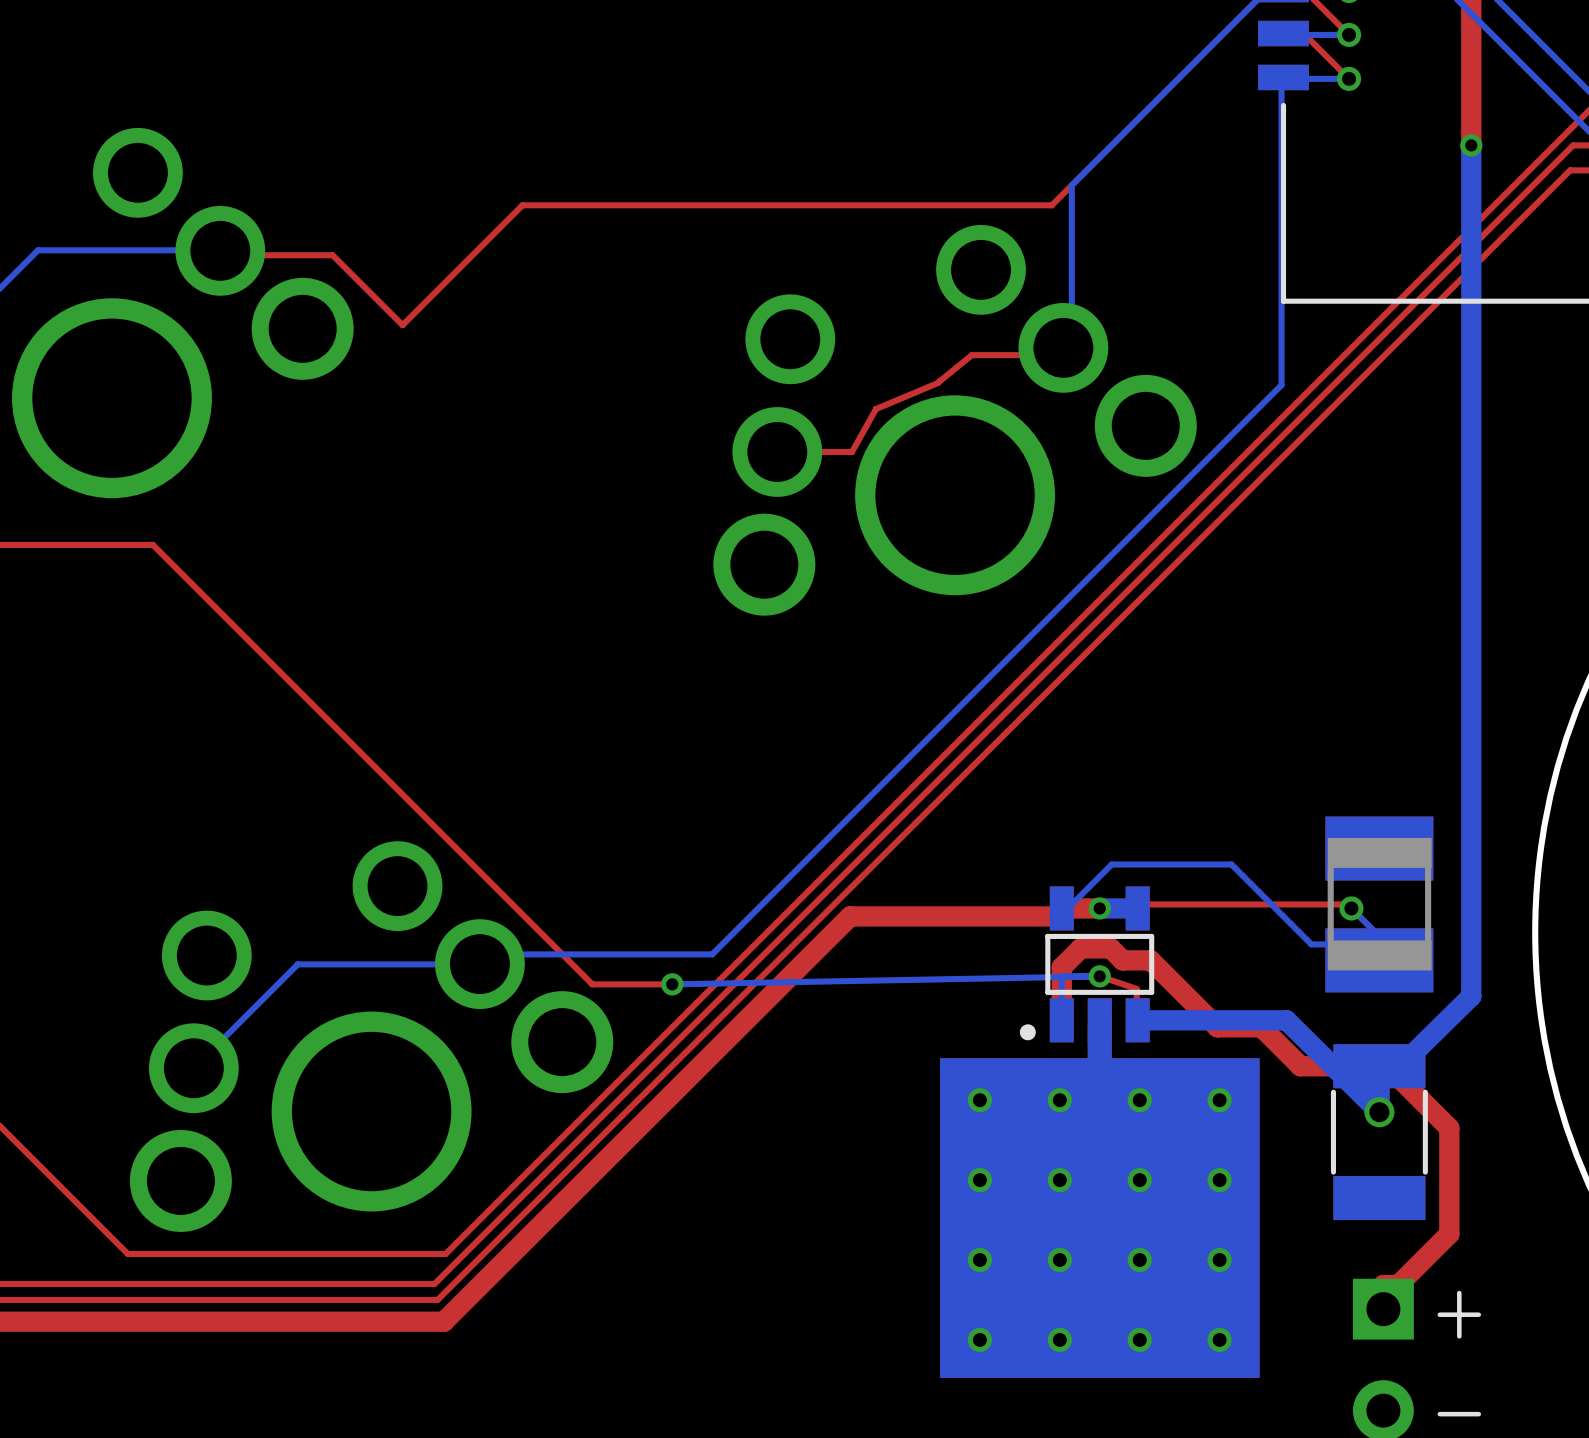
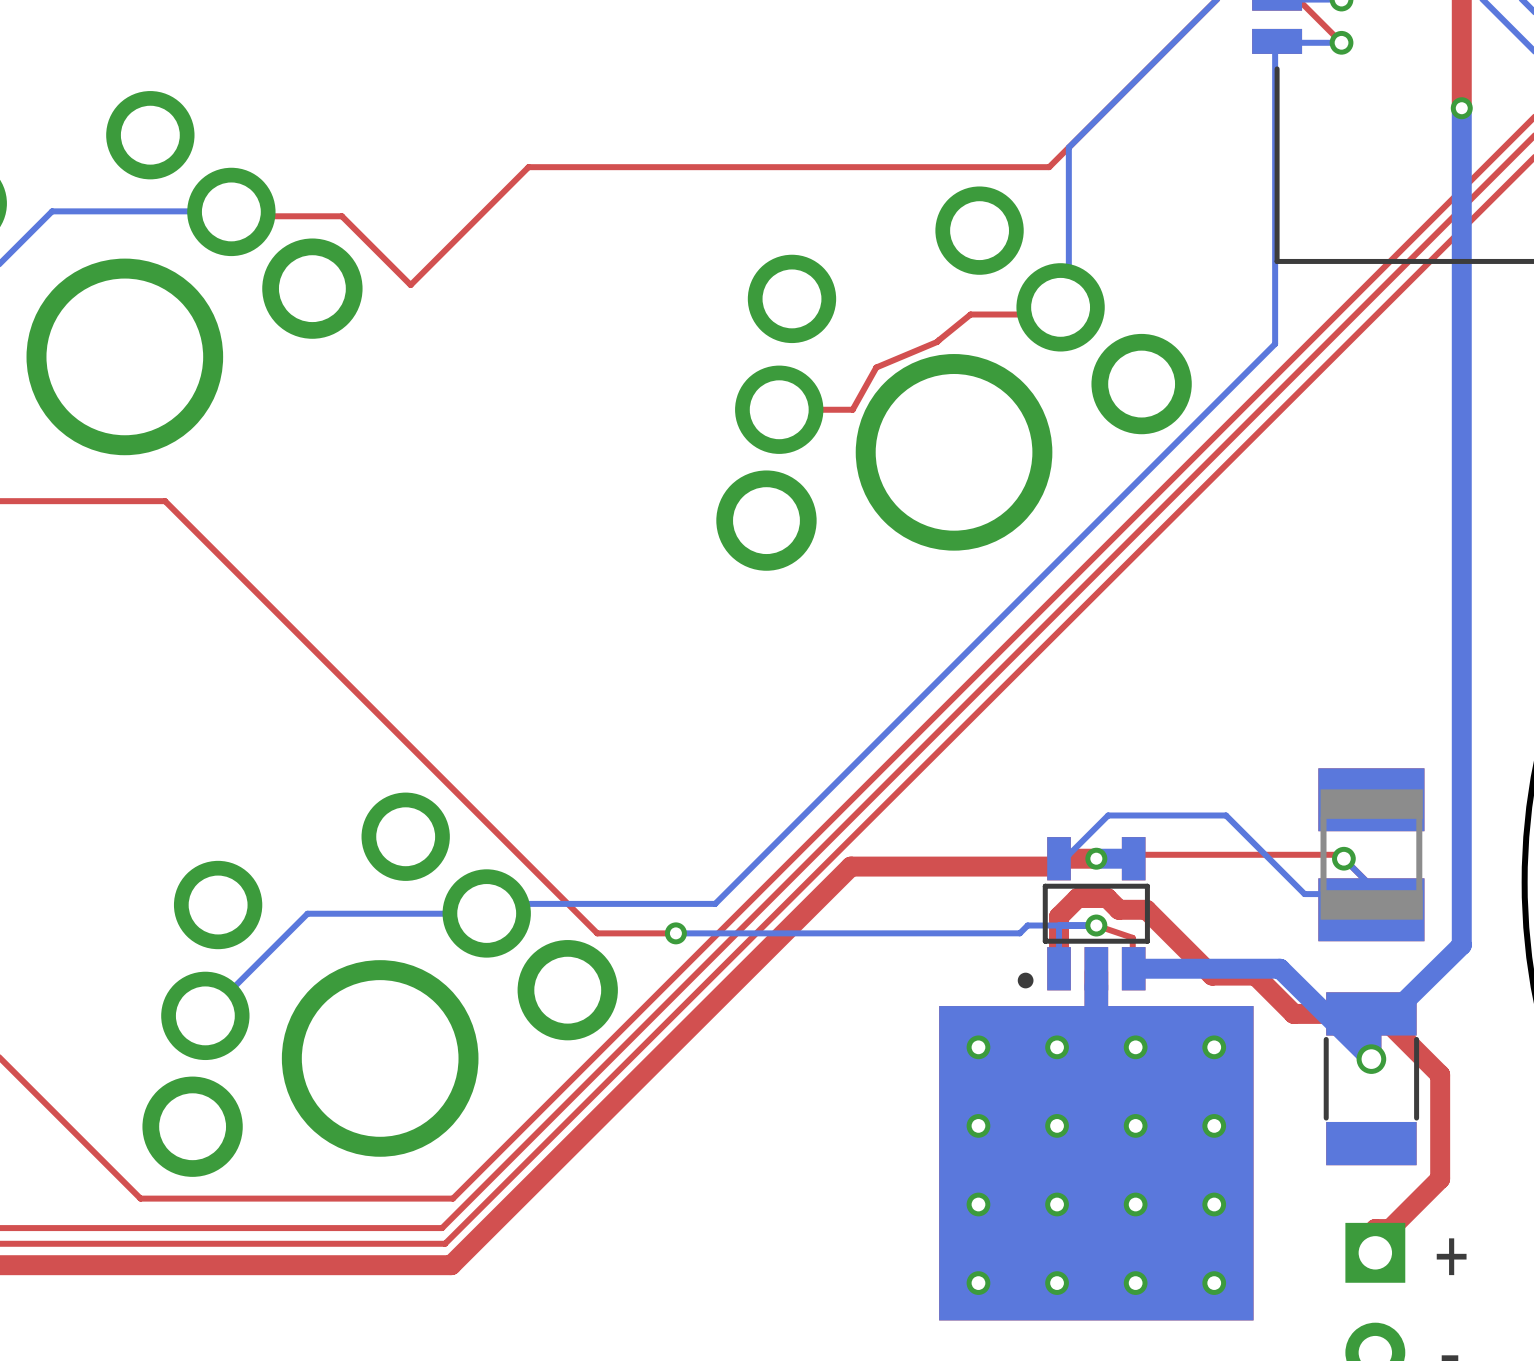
bottom track: (1099, 976) (672, 984) -> (1059, 925) (1027, 925) (1019, 933) (675, 933)

